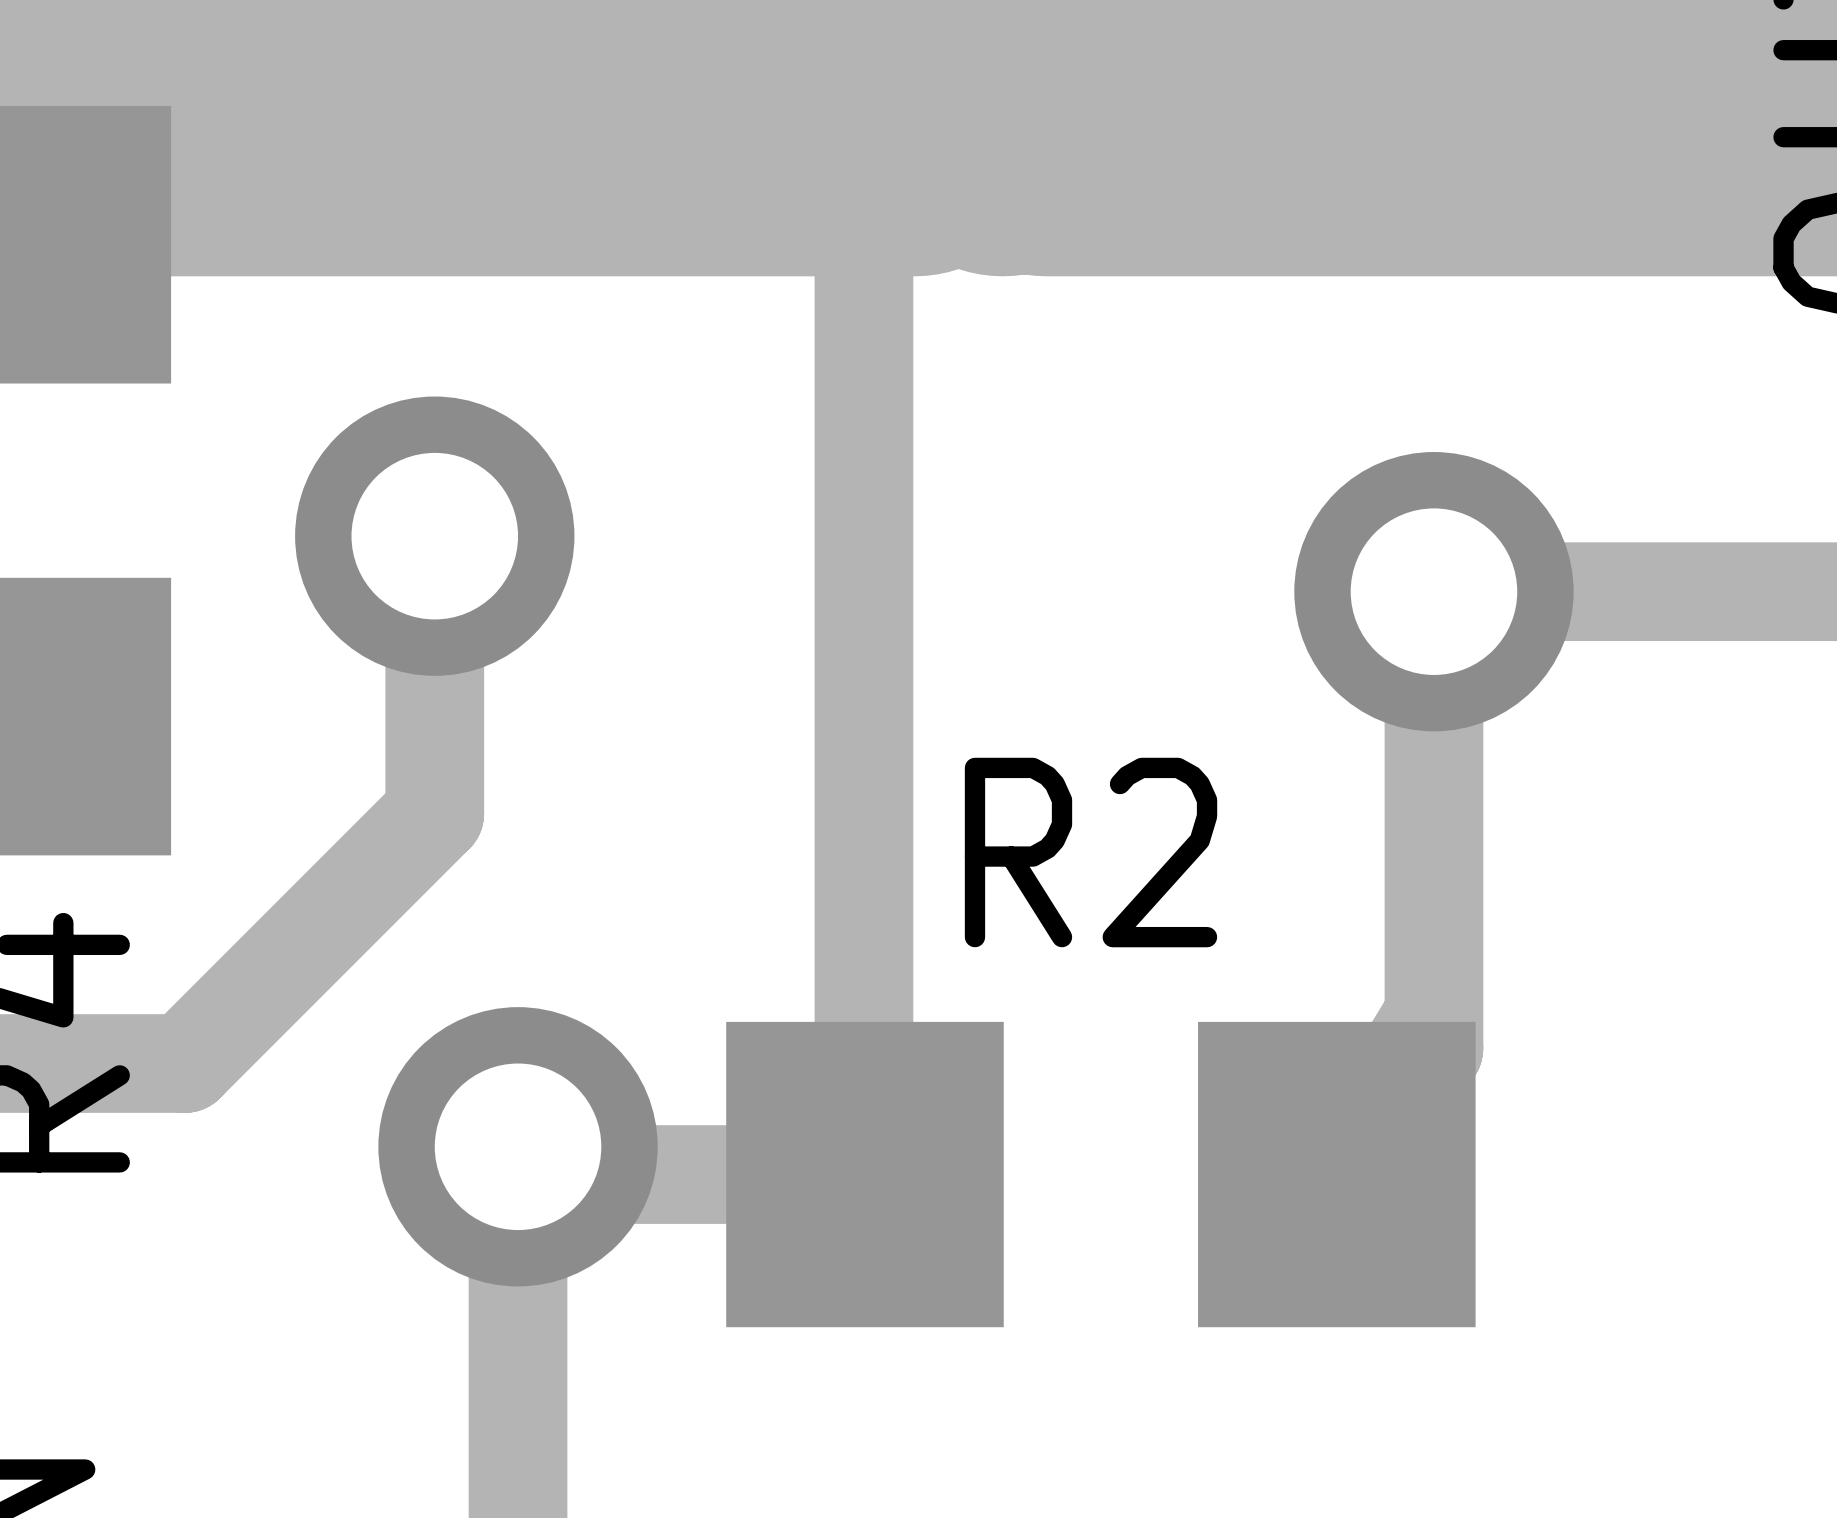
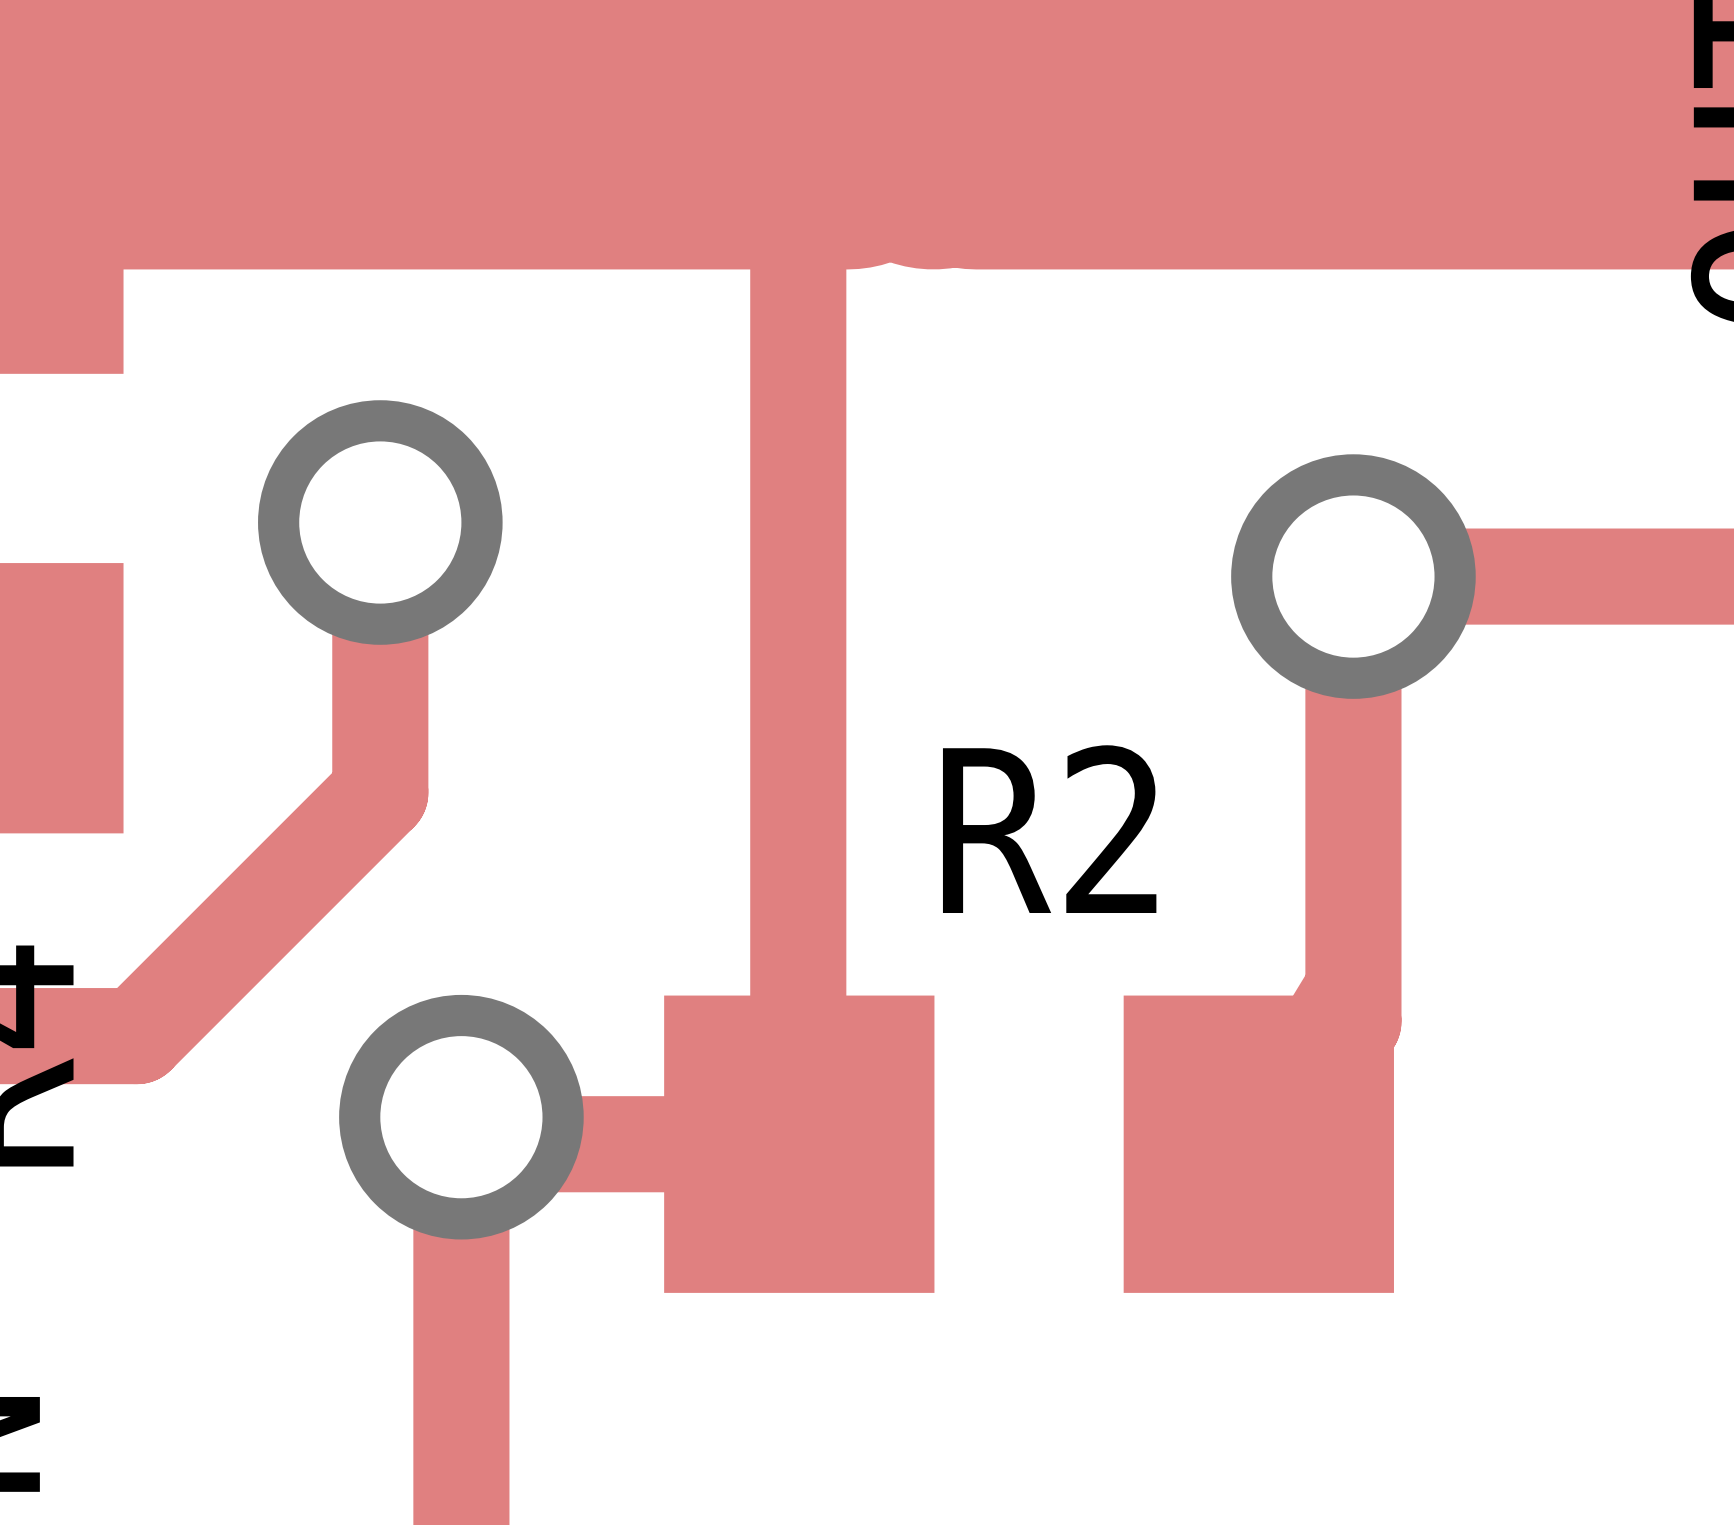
via size: [295, 396, 575, 676] -> [258, 400, 503, 645]
via size: [1294, 452, 1574, 732] -> [1231, 454, 1476, 699]
via size: [378, 1007, 658, 1287] -> [339, 994, 584, 1240]

